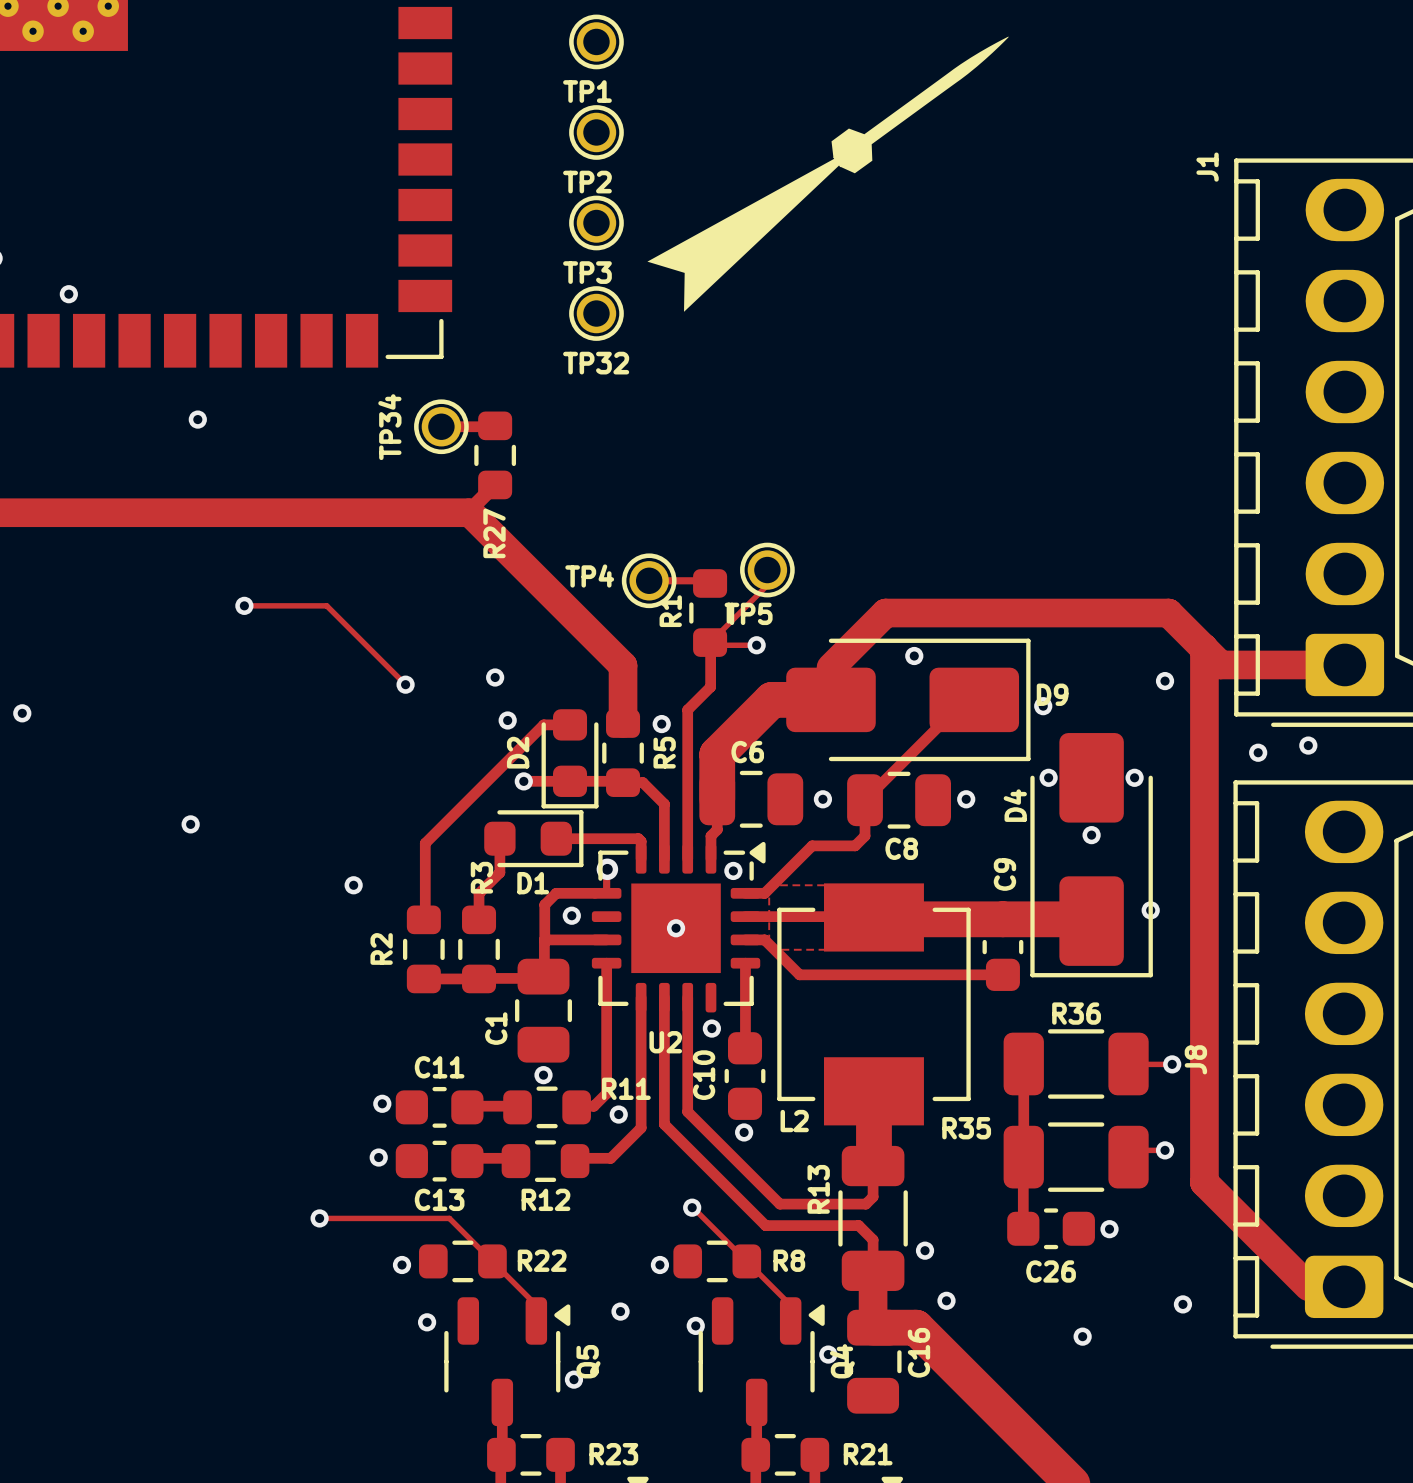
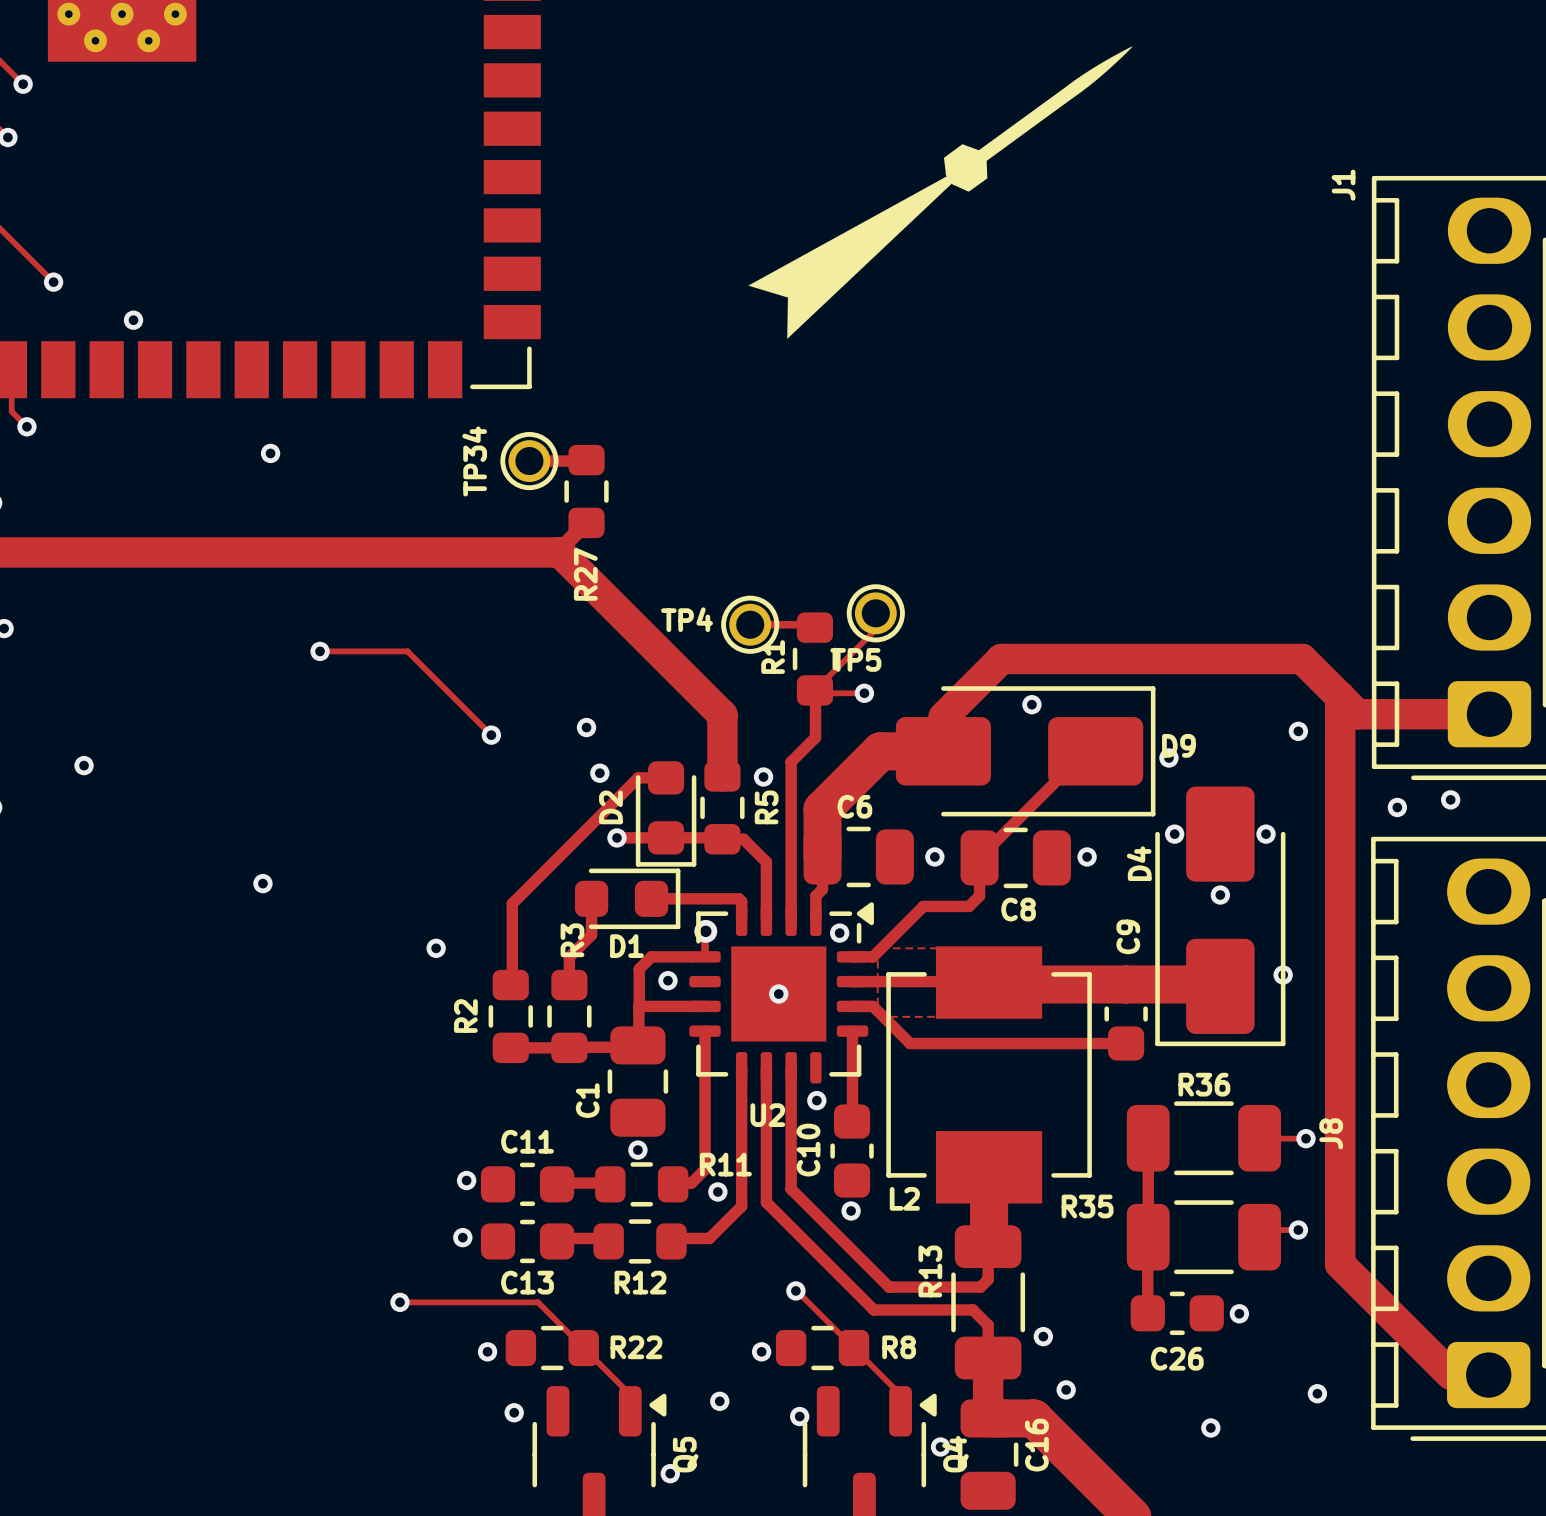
TP1: (596, 41) -> none
TP2: (596, 132) -> none
TP3: (596, 223) -> none
TP32: (596, 313) -> none

